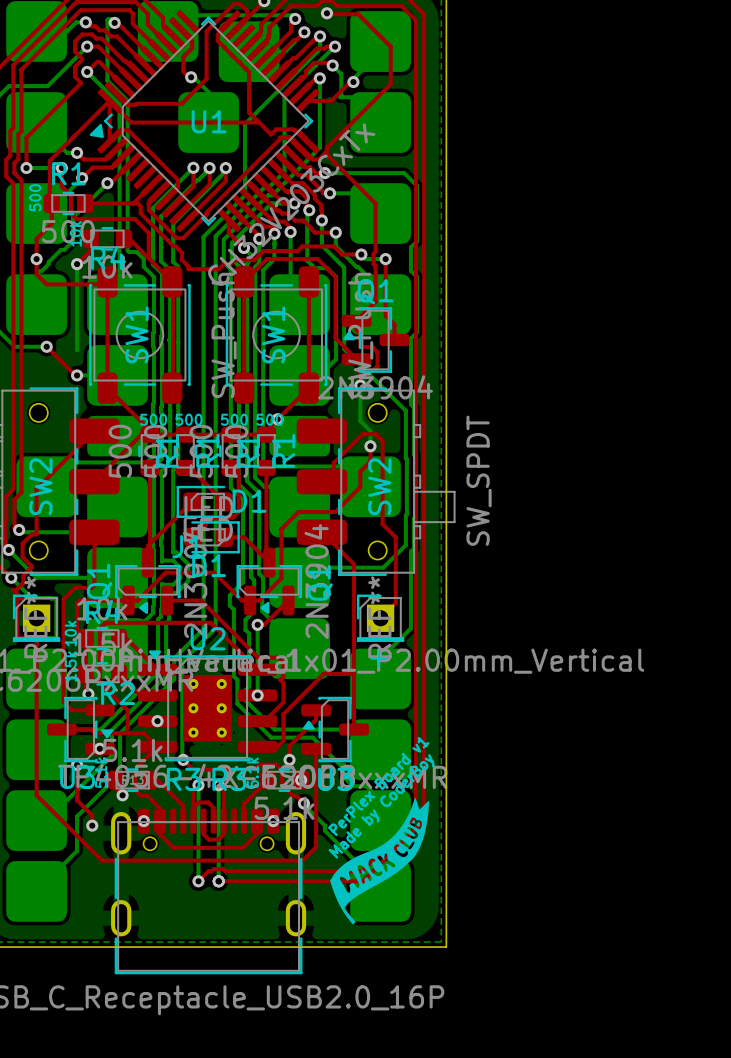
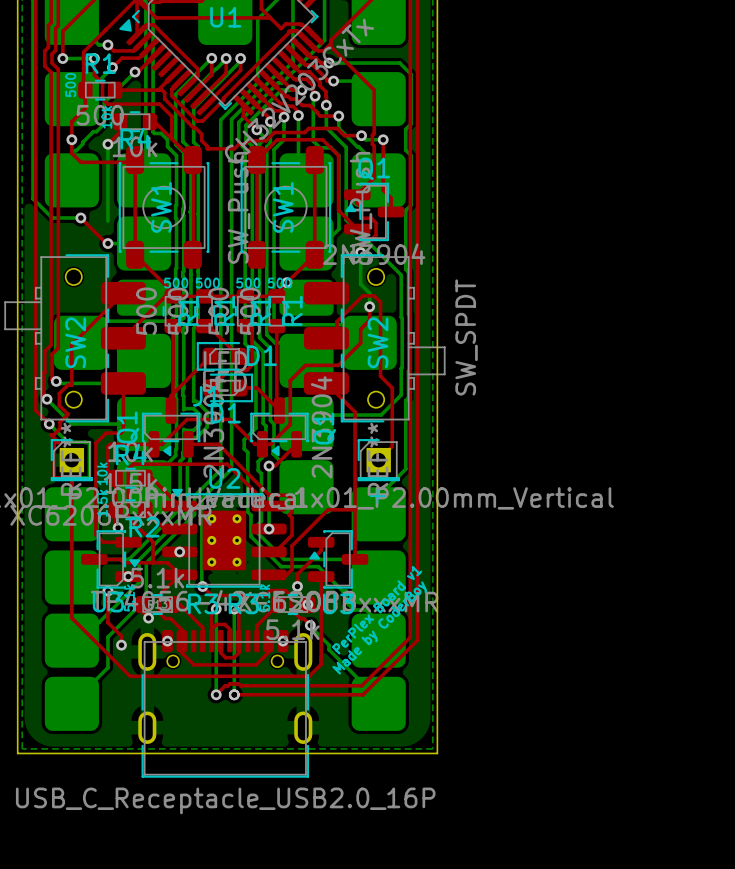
drawing: [330, 797, 430, 925] -> none

